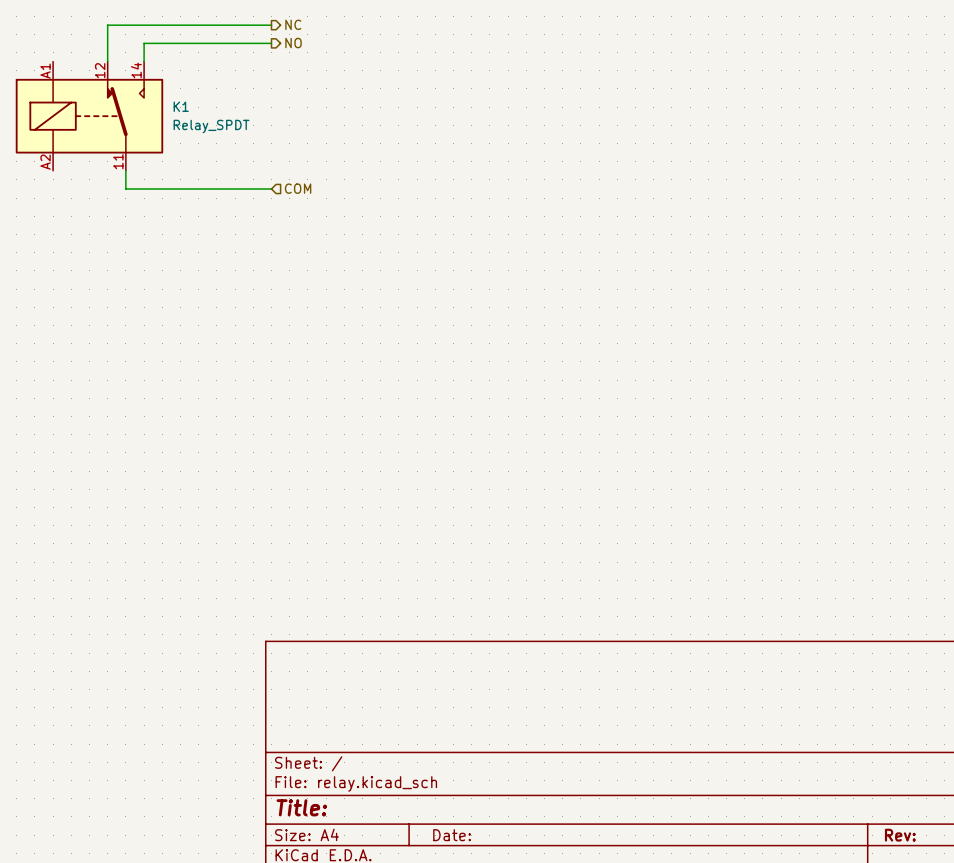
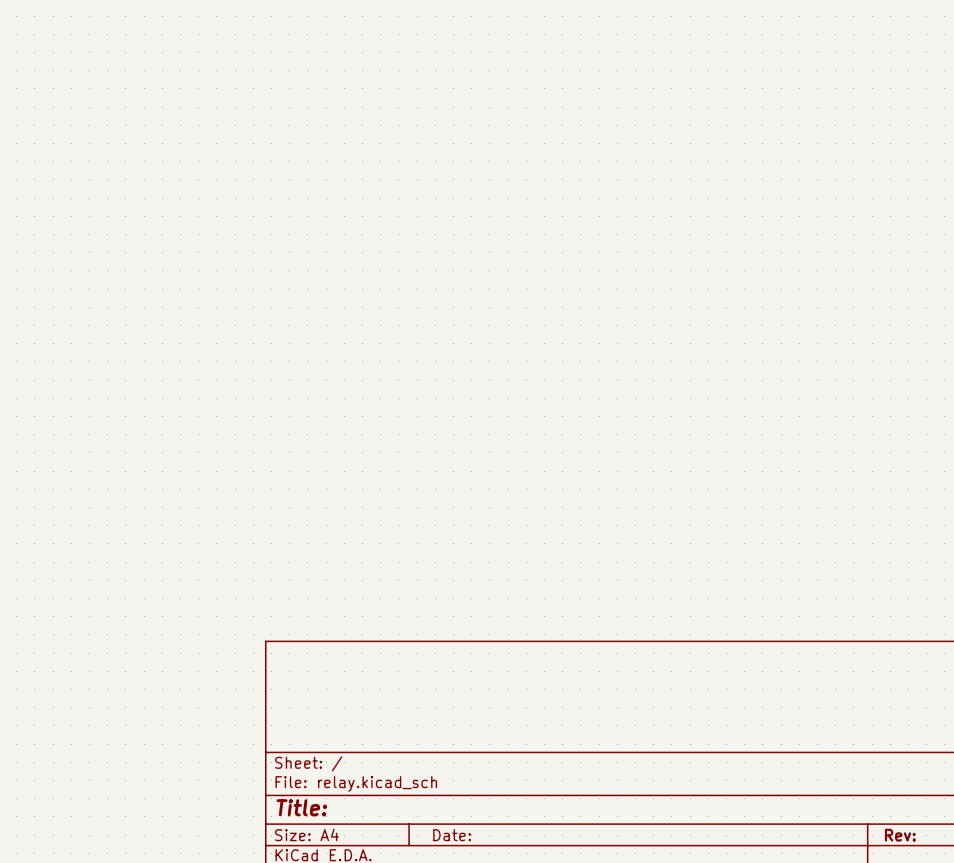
hierarchical label: NC (293, 24) -> none
wire: (271, 25) (107, 25) (107, 61) -> none
wire: (271, 43) (144, 43) (144, 61) -> none
hierarchical label: NO (293, 43) -> none
K1: Relay_SPDT (89, 116) -> none
wire: (125, 170) (125, 188) (271, 188) -> none
hierarchical label: COM (298, 188) -> none

